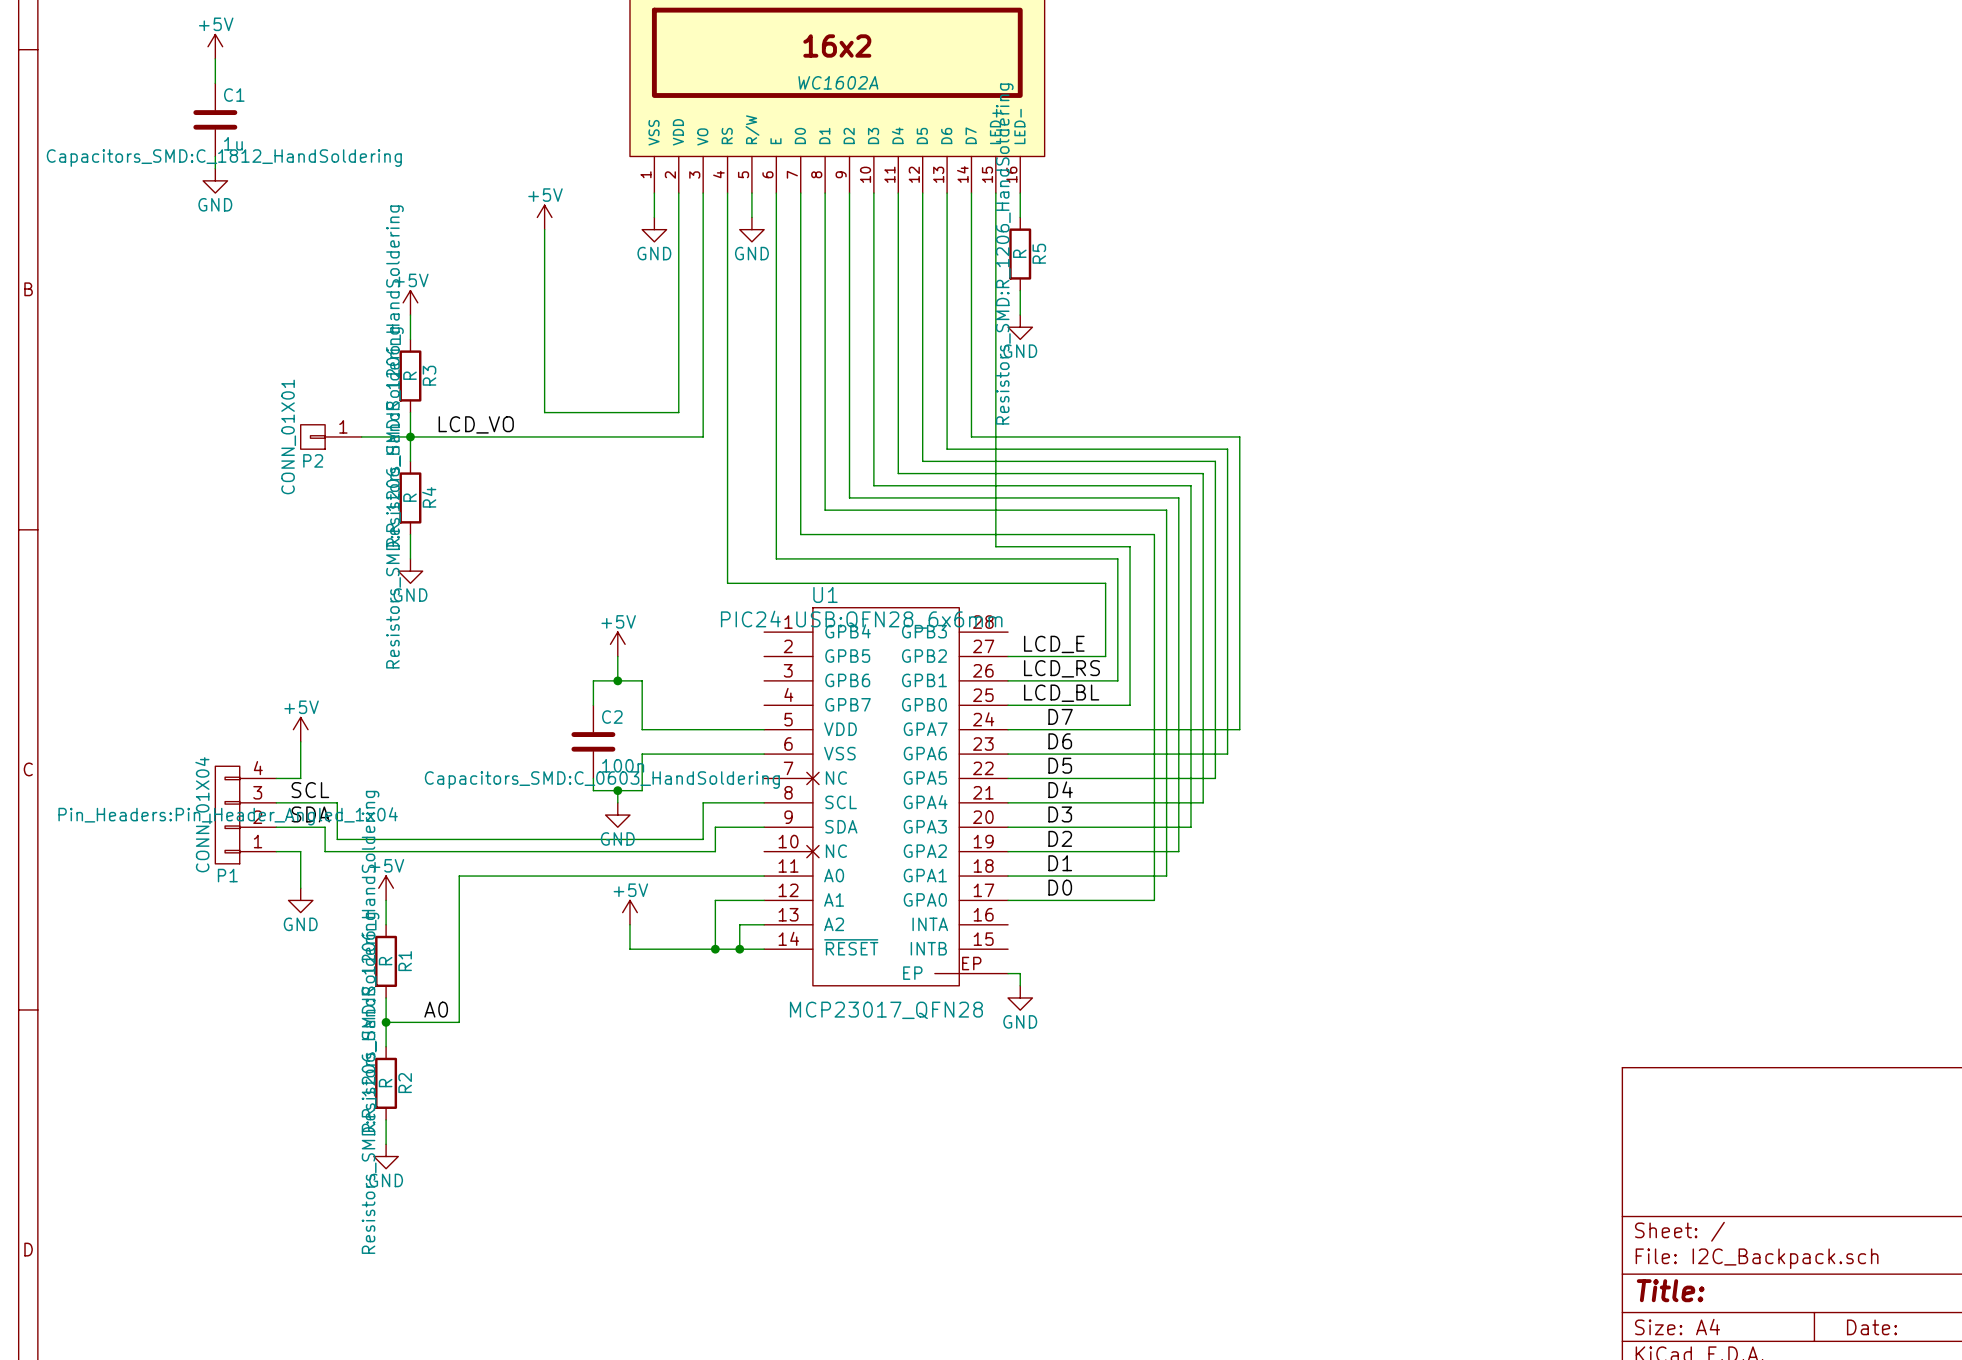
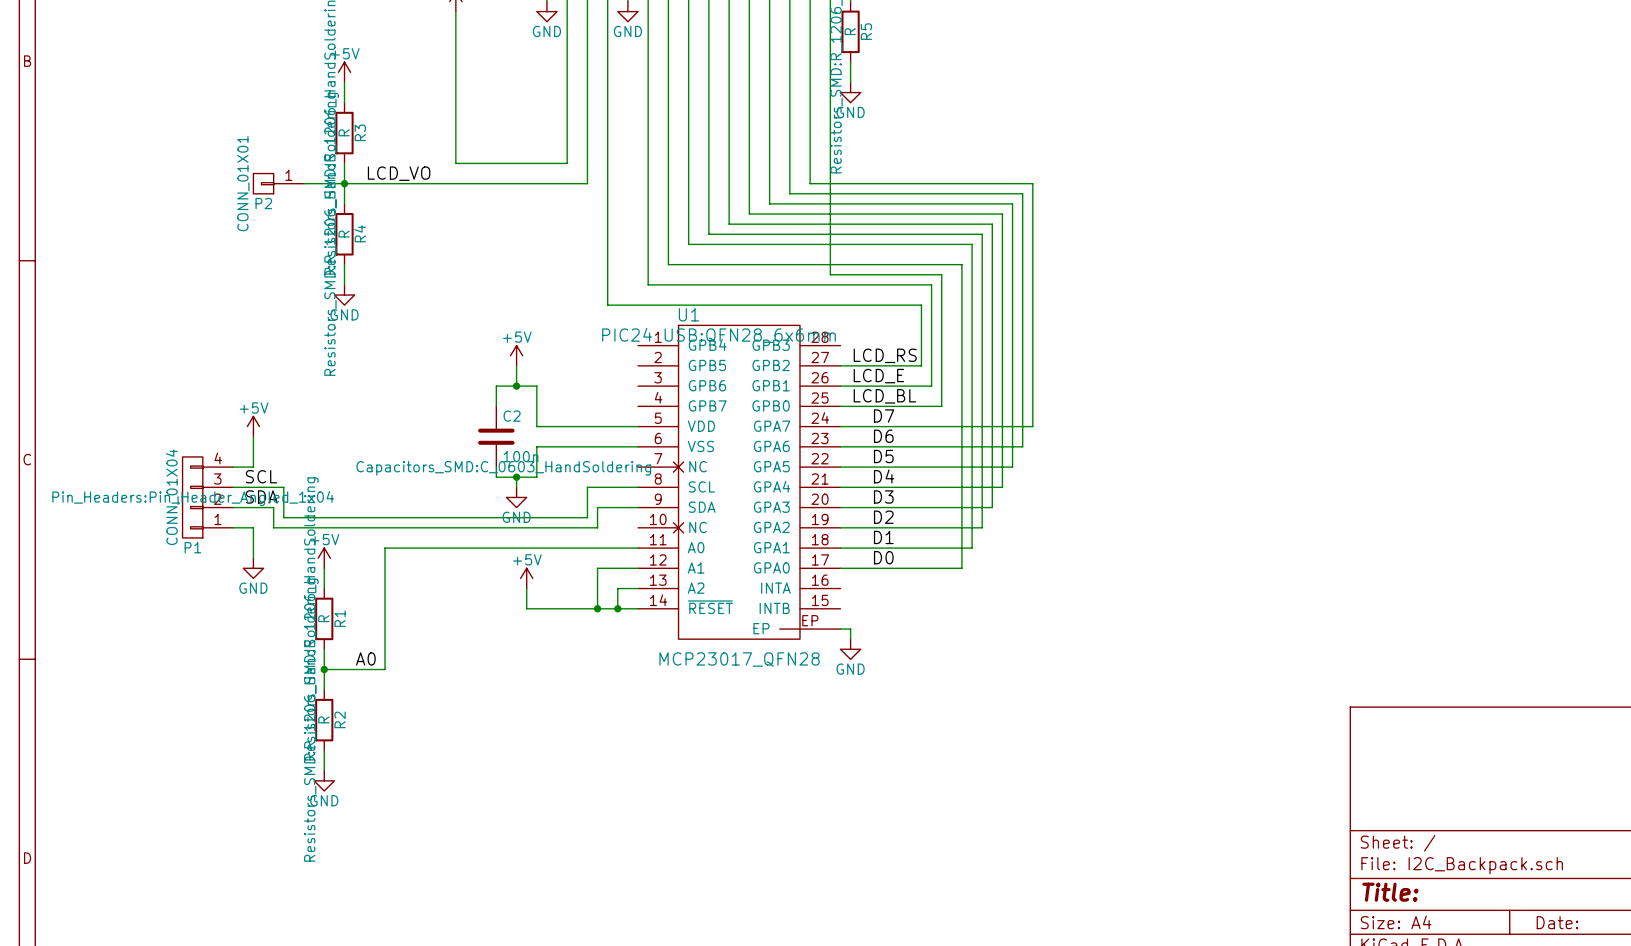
label: LCD_E (1054, 644) -> LCD_RS (885, 355)
label: LCD_RS (1061, 668) -> LCD_E (878, 376)

